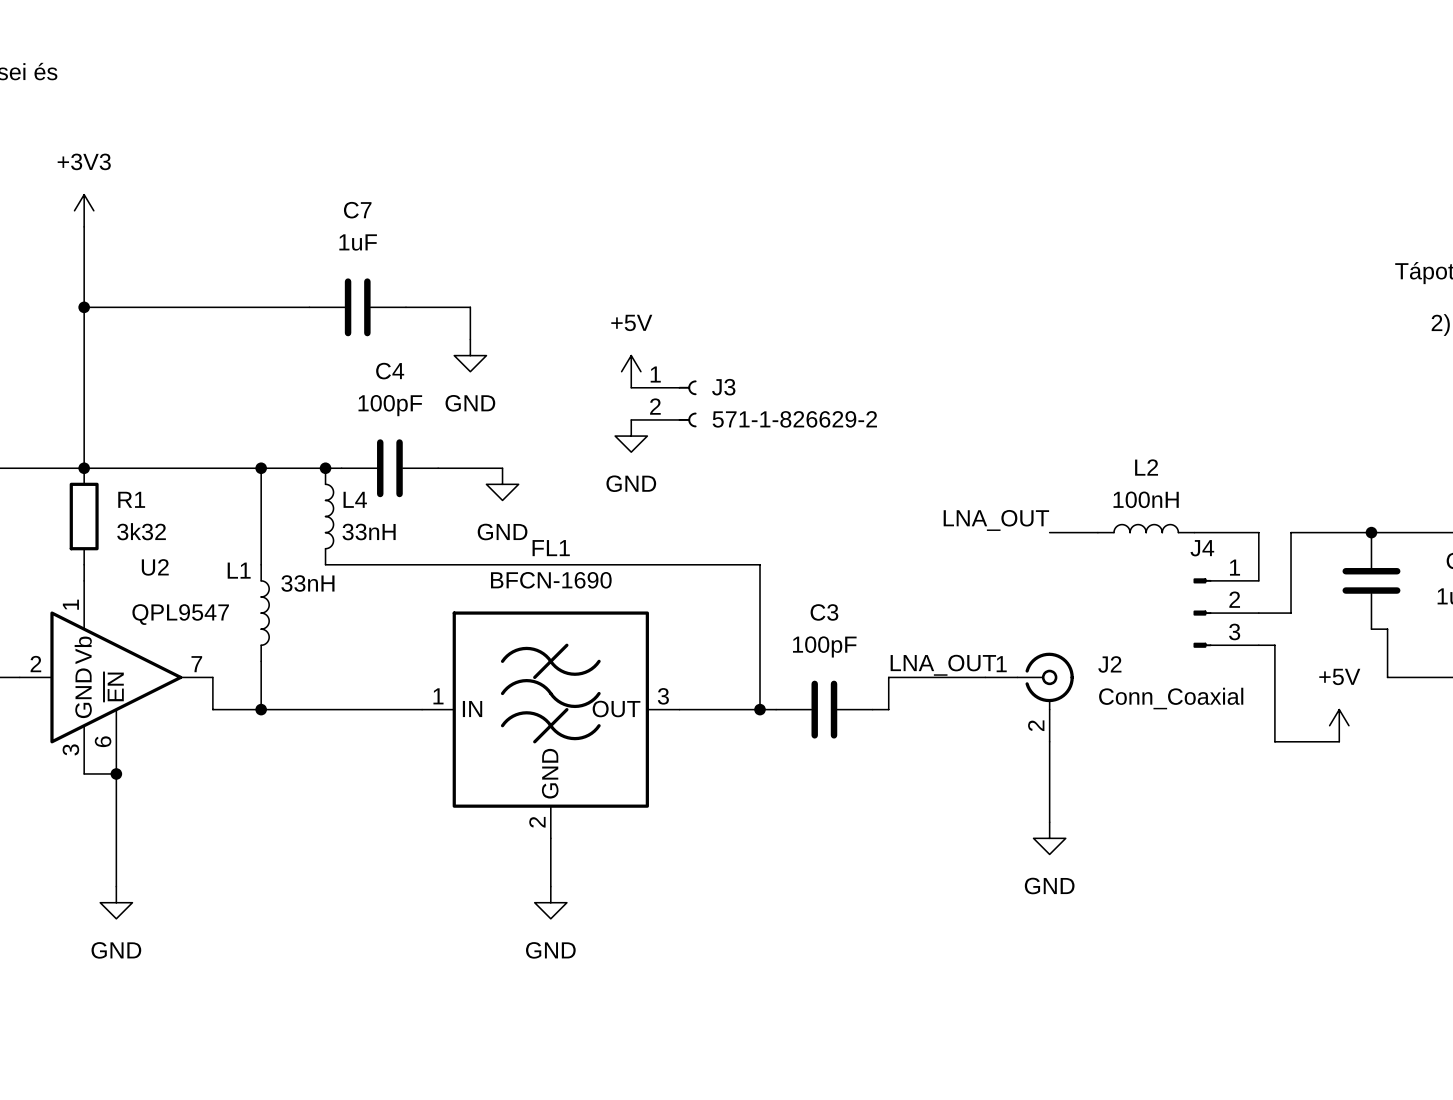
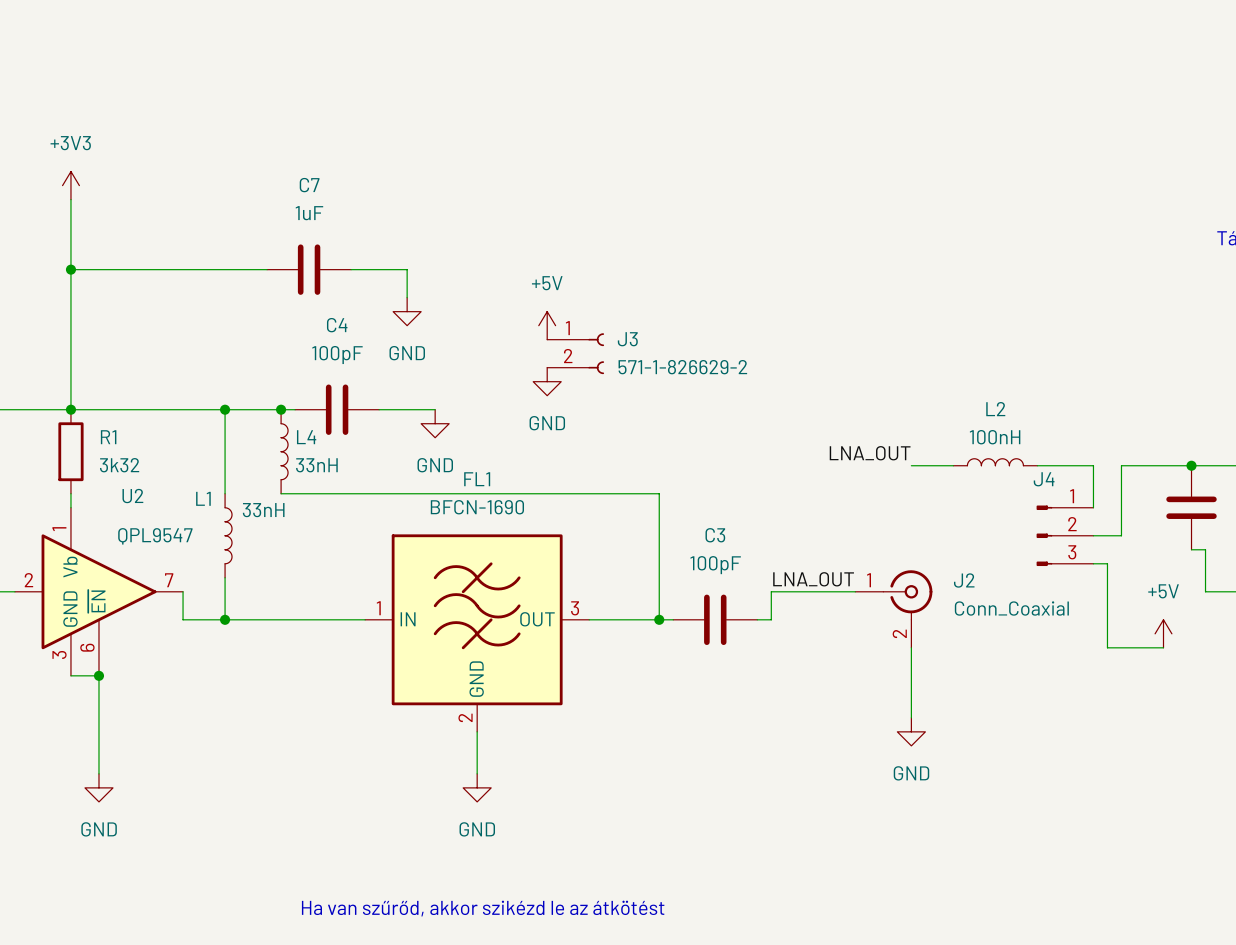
text: none -> Ha van szűrőd, akkor szikézd le az átkötést (483, 908)

